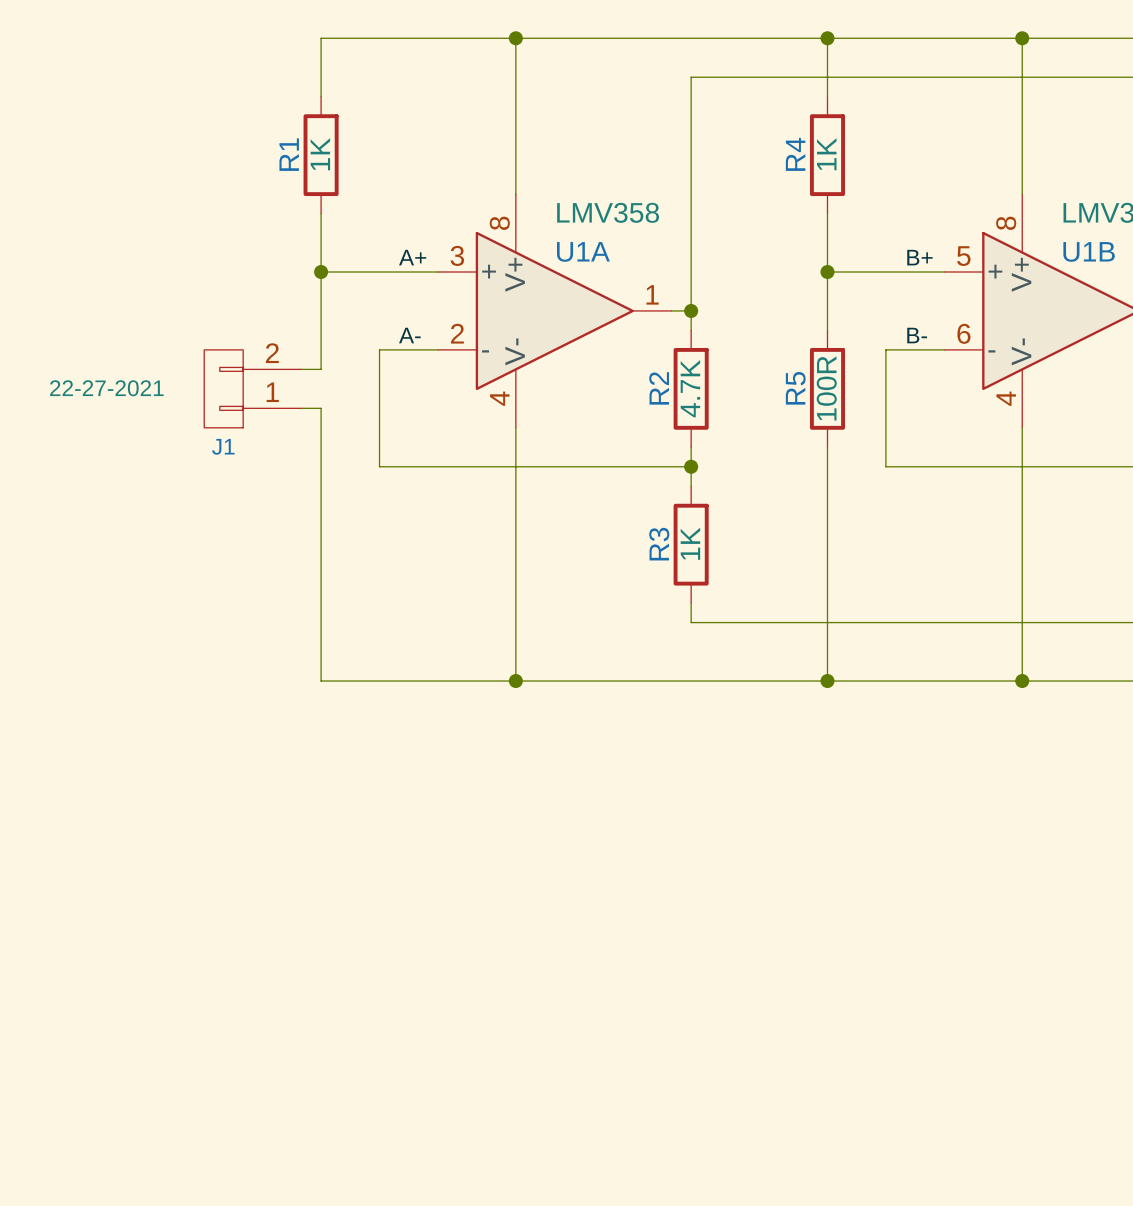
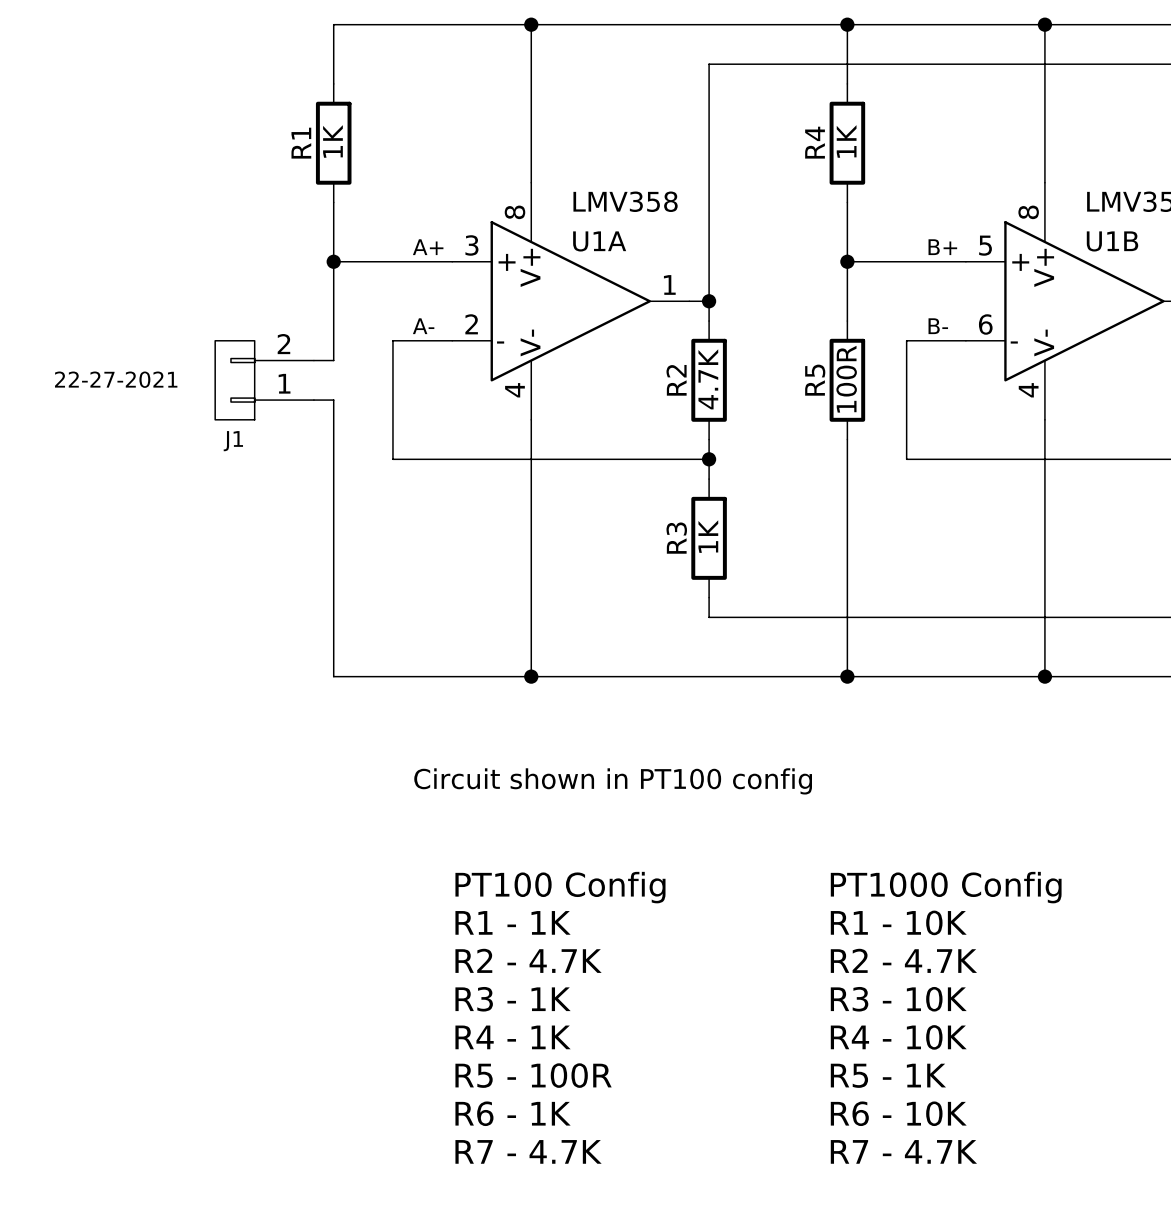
text: none -> Circuit shown in PT100 config (613, 781)
text: none -> PT100 Config (560, 887)
text: none -> PT1000 Config (946, 887)
text: none -> R1 - 1K (513, 922)
text: none -> R1 - 10K (898, 922)
text: none -> R2 - 4.7K (528, 960)
text: none -> R2 - 4.7K (903, 960)
text: none -> R3 - 1K (513, 999)
text: none -> R3 - 10K (898, 999)
text: none -> R4 - 1K (513, 1037)
text: none -> R4 - 10K (898, 1037)
text: none -> R5 - 100R (533, 1075)
text: none -> R5 - 1K (888, 1075)
text: none -> R6 - 1K (513, 1113)
text: none -> R6 - 10K (898, 1113)
text: none -> R7 - 4.7K (528, 1151)
text: none -> R7 - 4.7K (903, 1151)

